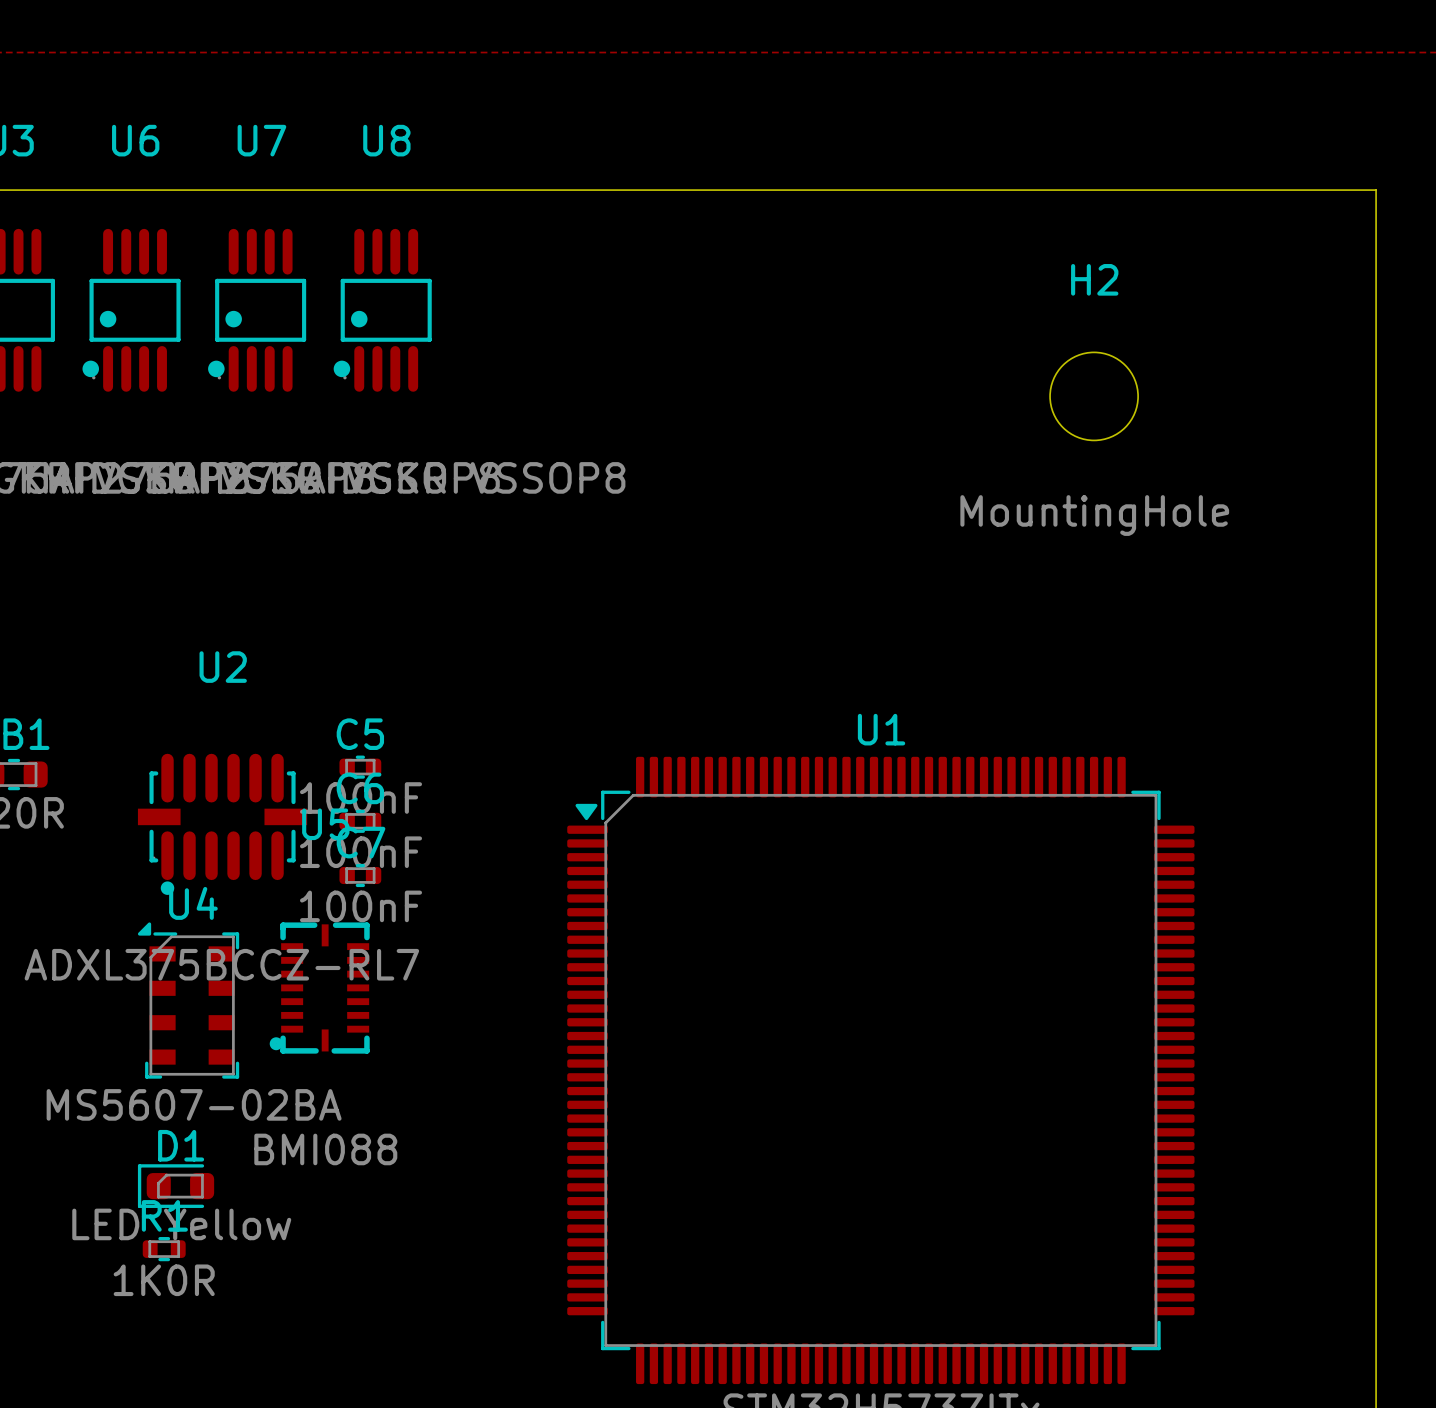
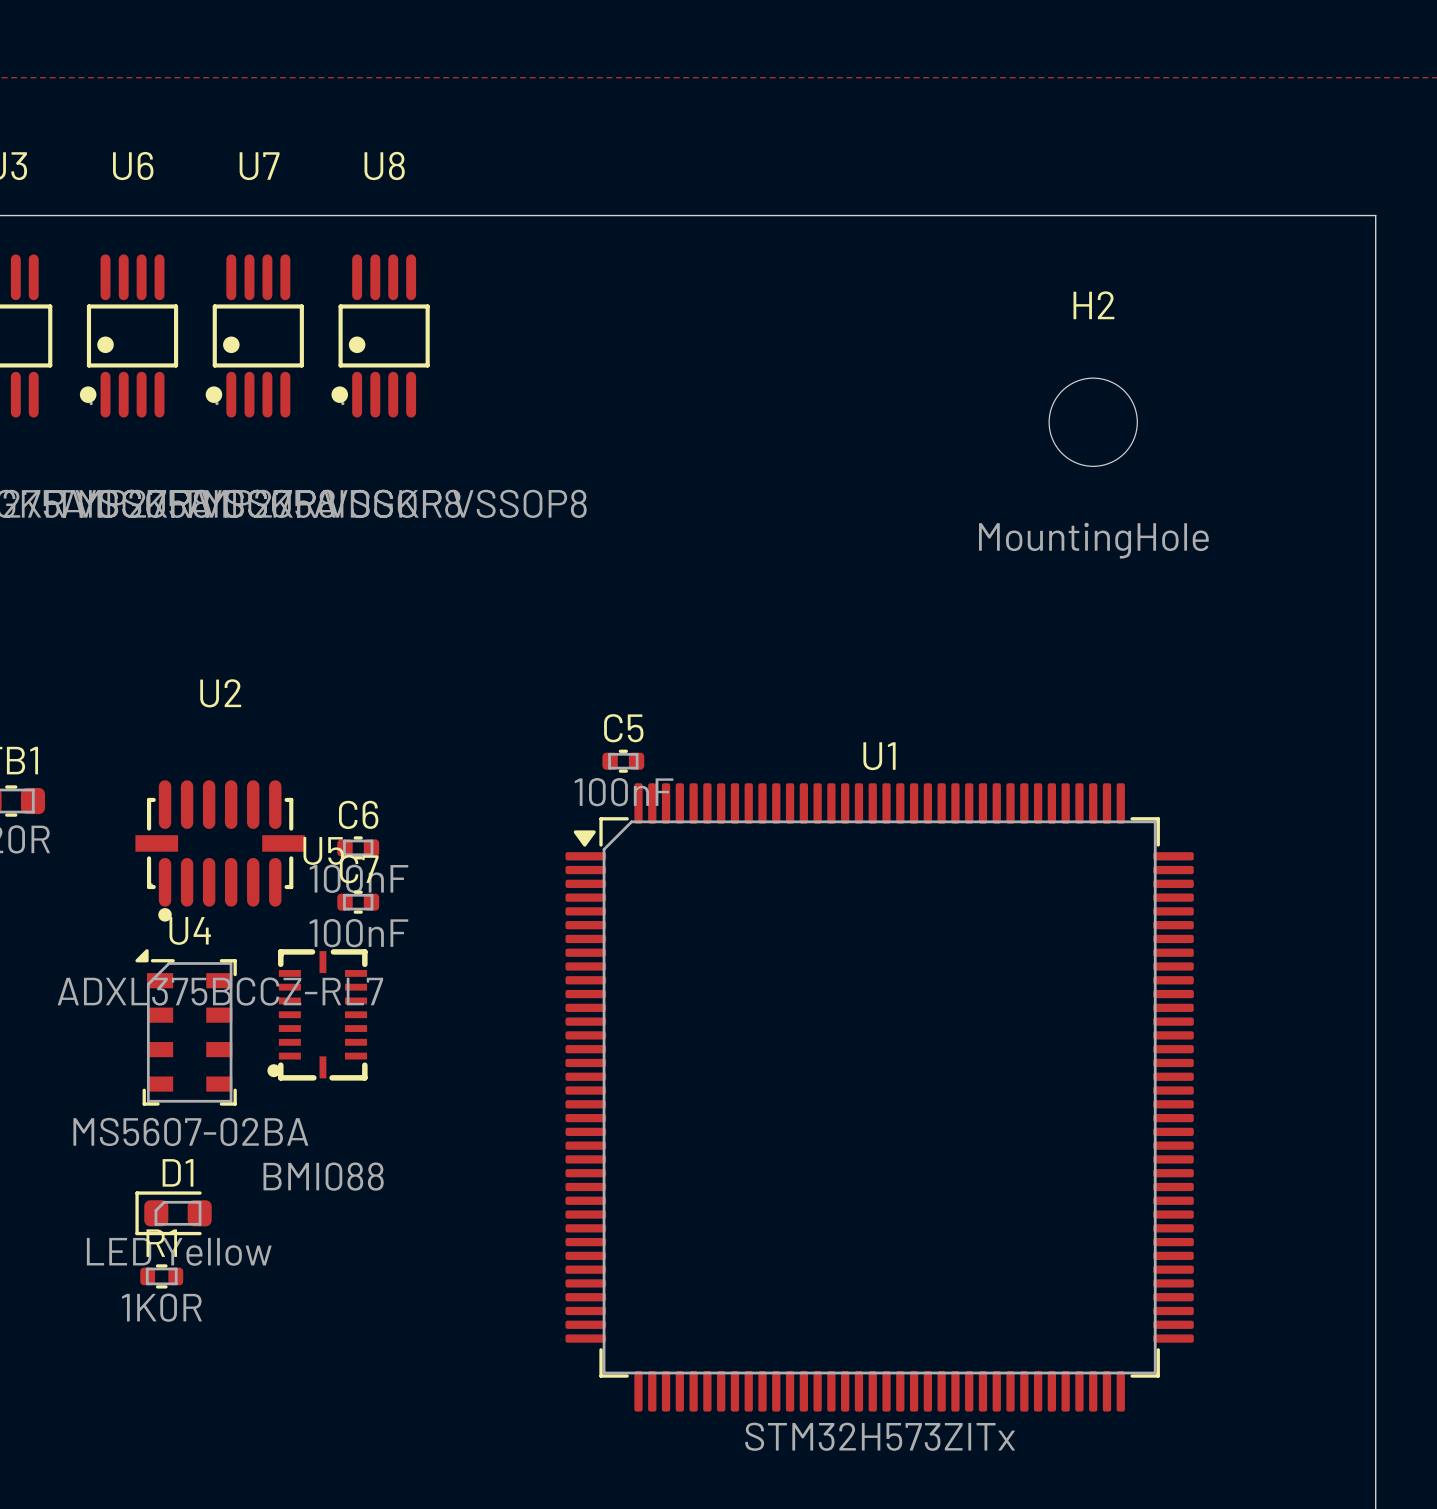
C5 position: (360, 767) -> (623, 761)

